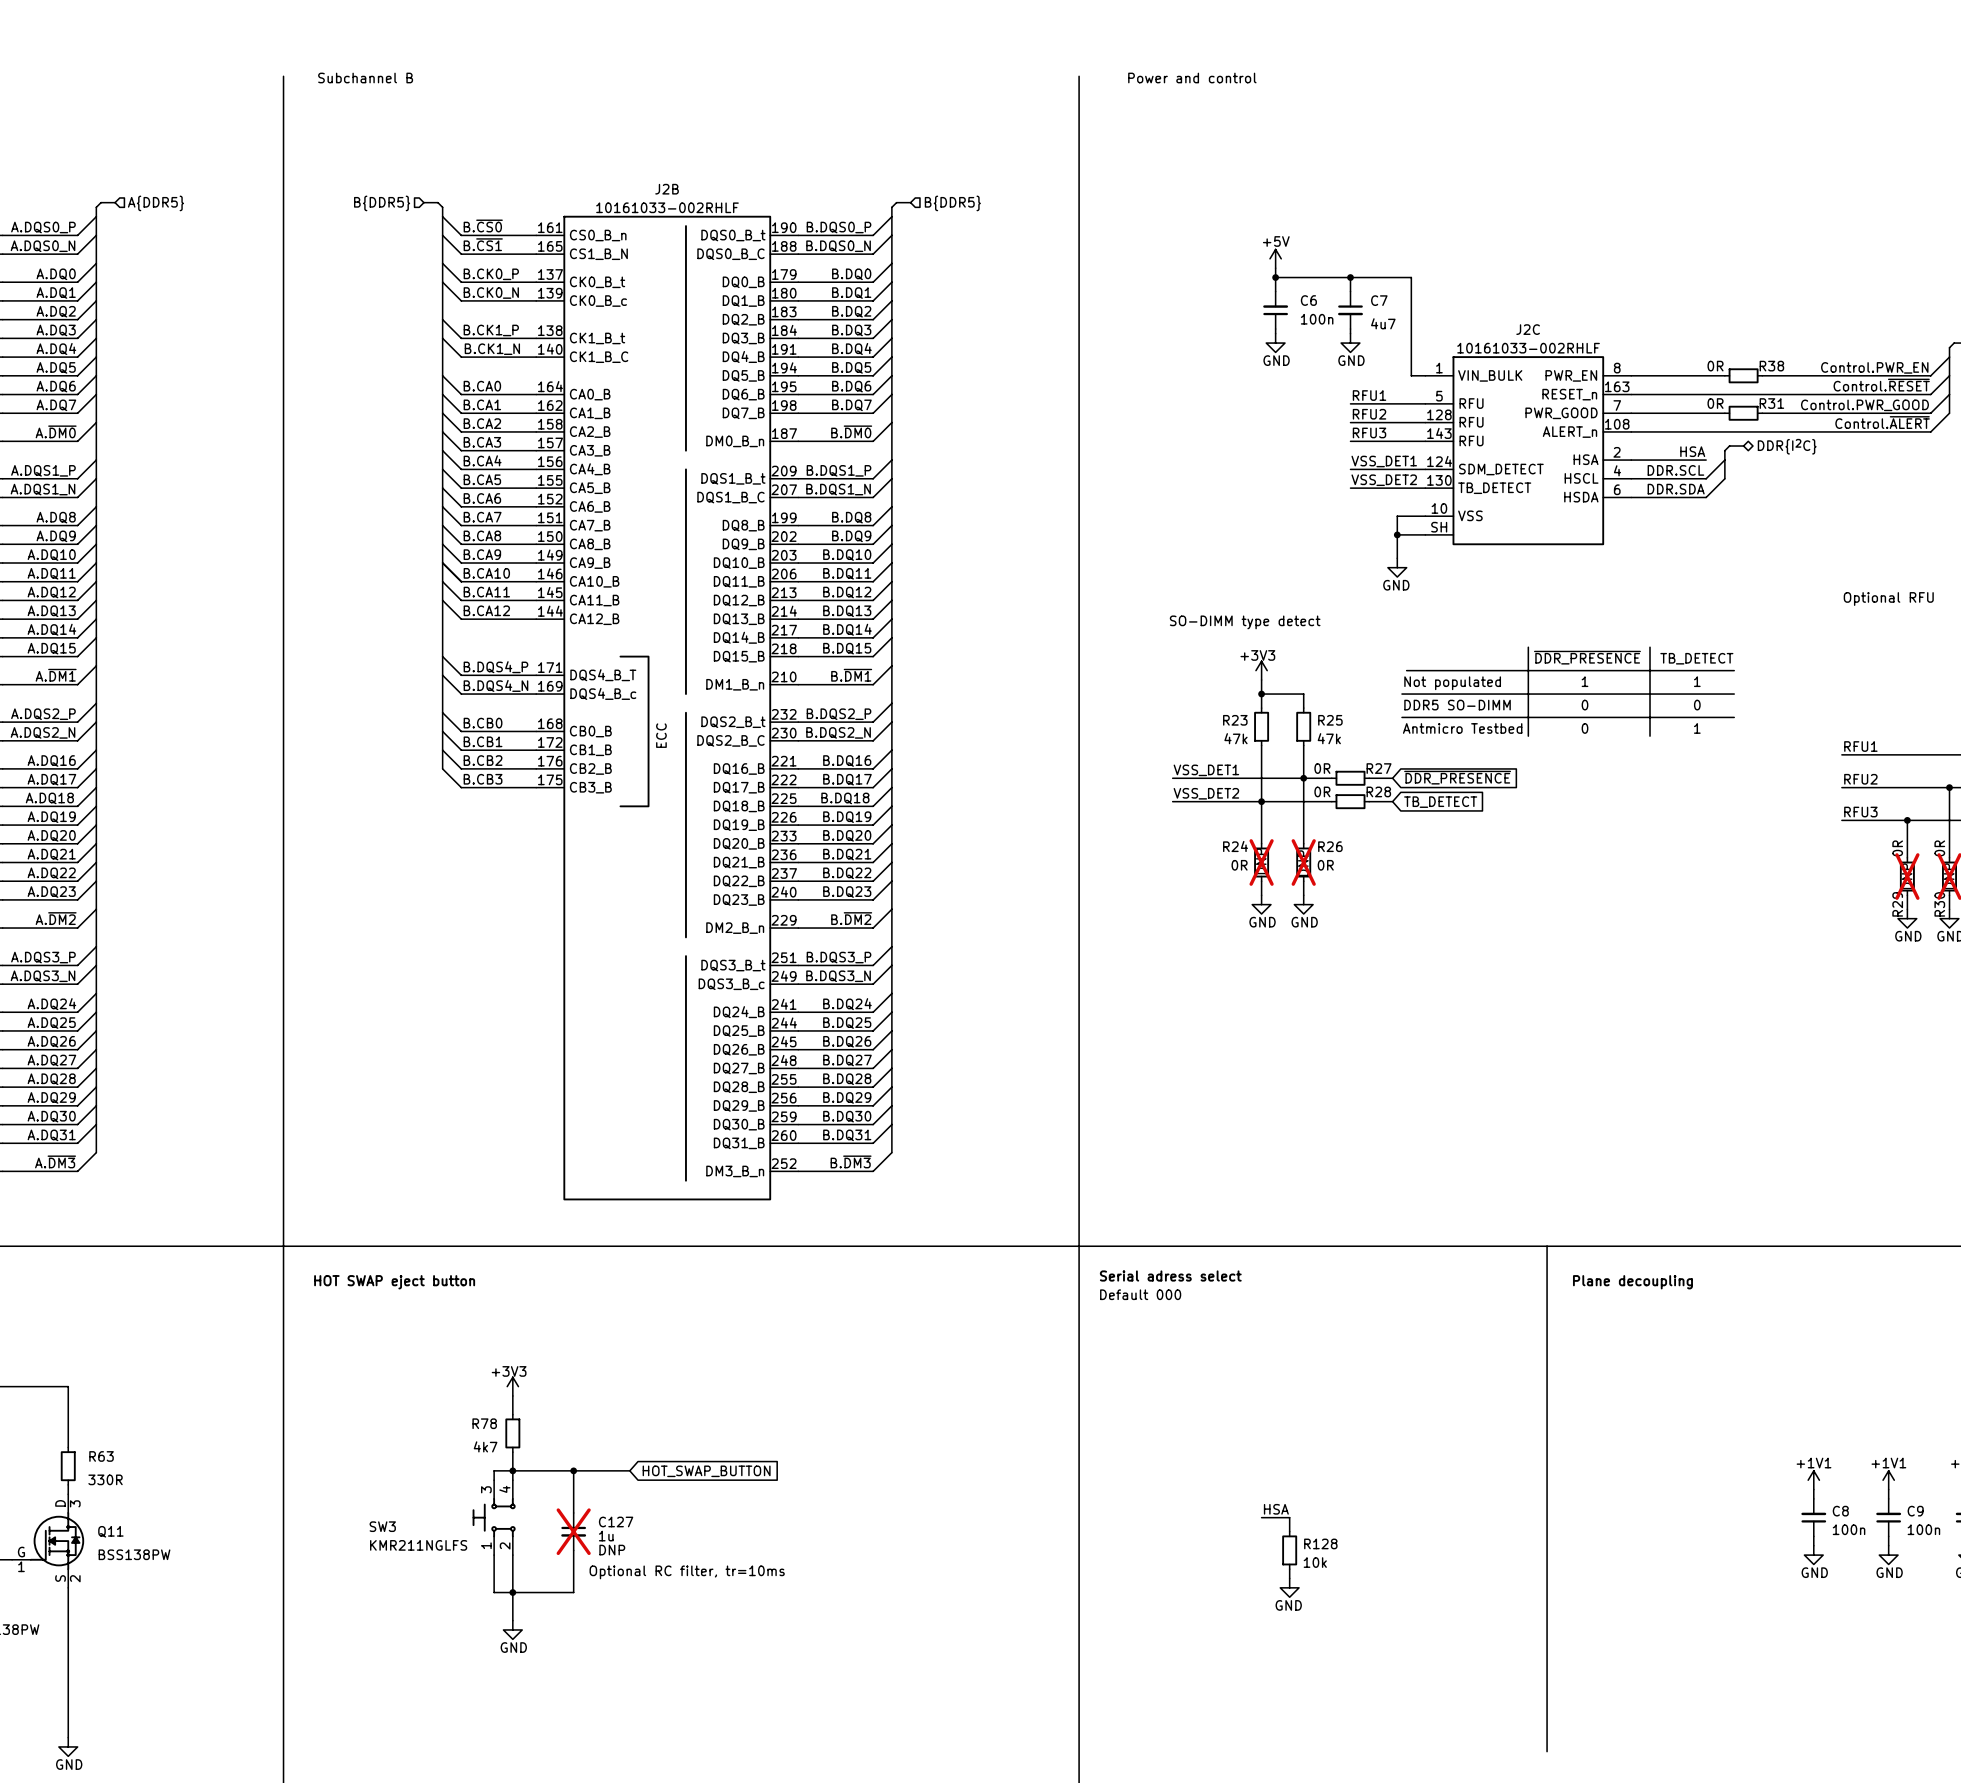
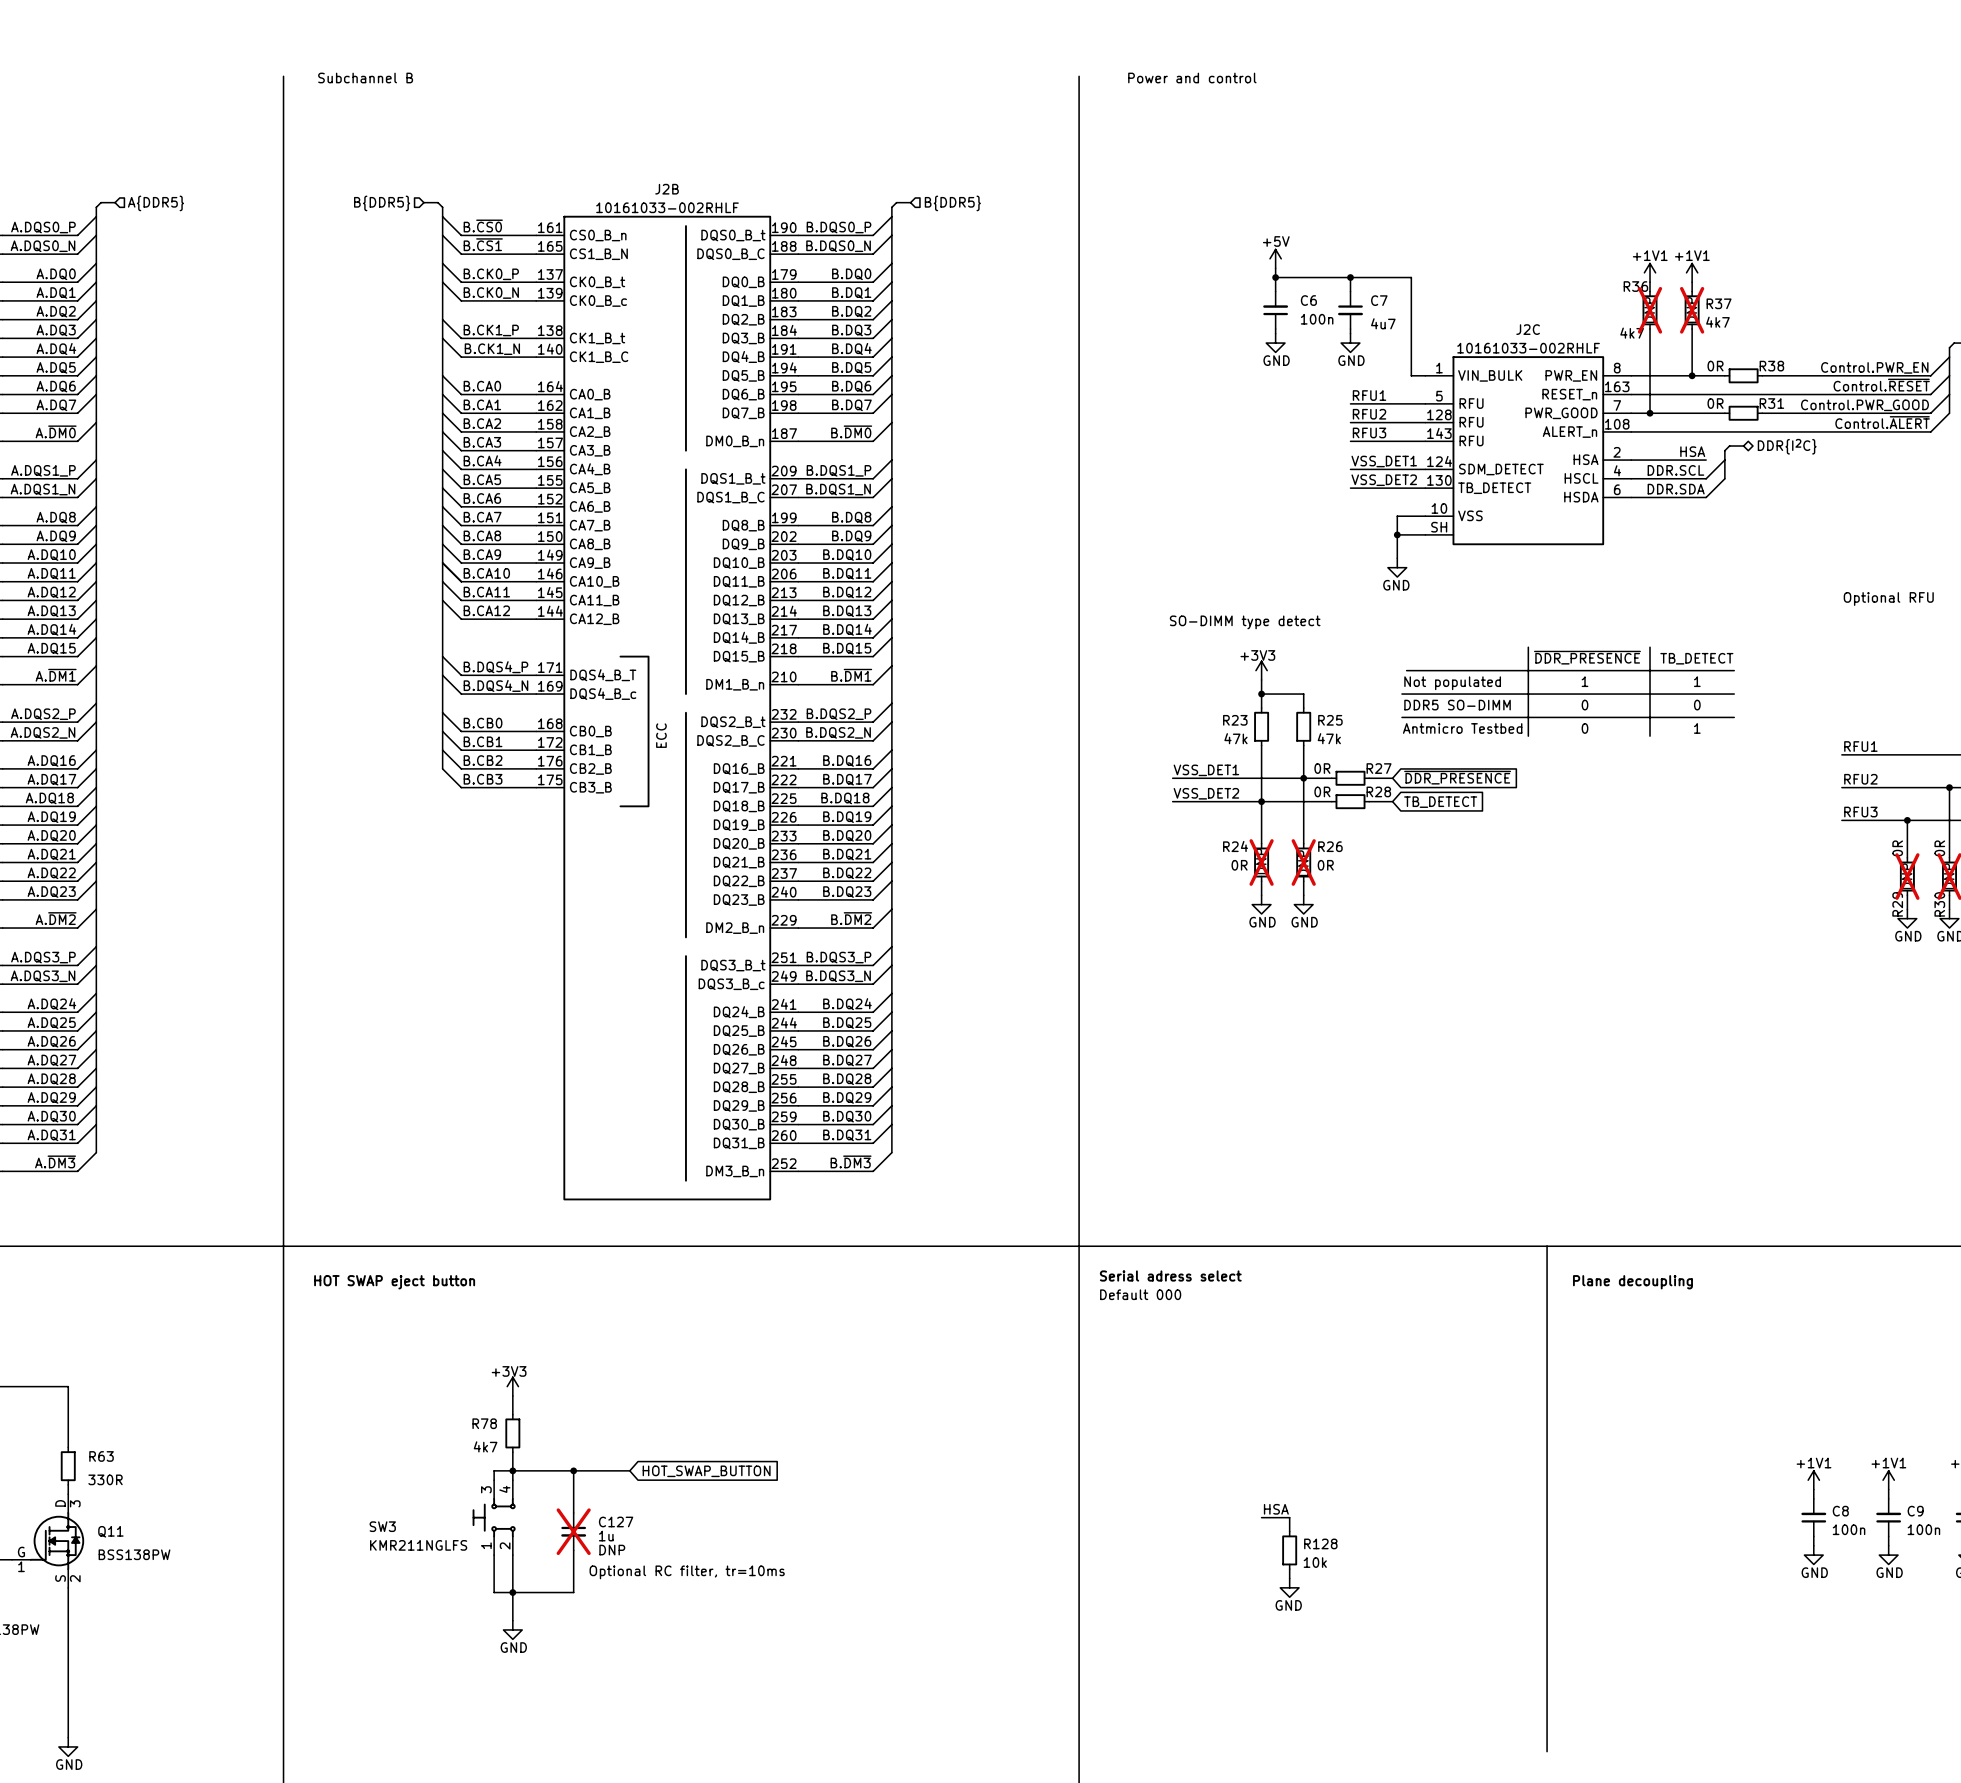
power symbol: none -> +1V1 (1650, 272)
power symbol: none -> +1V1 (1692, 272)
wire: none -> (1650, 282) (1650, 291)
wire: none -> (1692, 282) (1692, 291)
R36: none -> (1650, 310)
R37: none -> (1692, 310)
wire: none -> (1650, 329) (1650, 413)
wire: none -> (1692, 329) (1692, 375)
junction: none -> (1692, 375)
junction: none -> (1650, 413)

